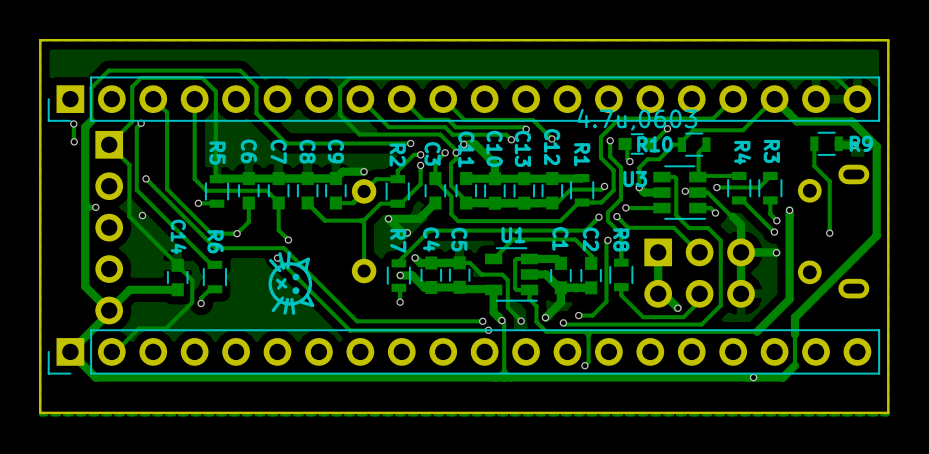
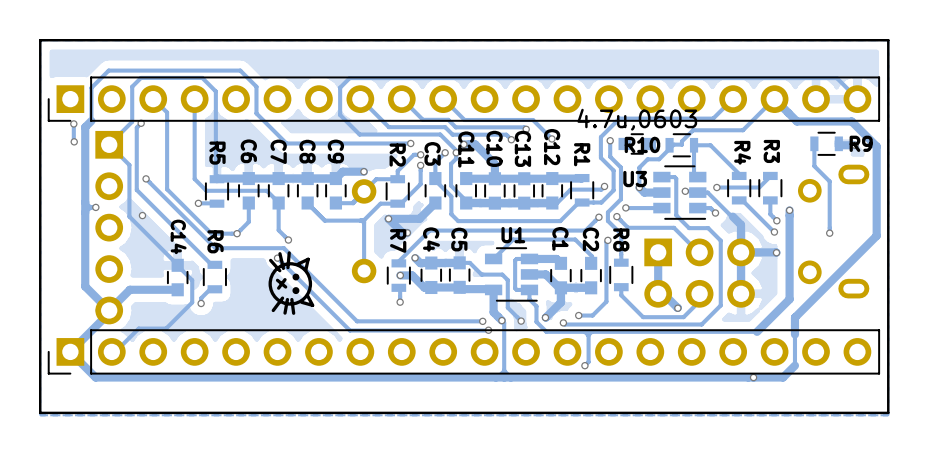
track: (667, 128) (651, 144) -> none
via: (667, 128) -> none
track: (626, 144) (627, 158) (629, 161) -> none
R10 position: (694, 144) -> (681, 145)
track: (706, 144) (698, 152) (698, 176) -> none
via: (629, 161) -> none
track: none -> (694, 173) (694, 145) (710, 145) (740, 175)
track: (739, 175) (697, 177) -> none

